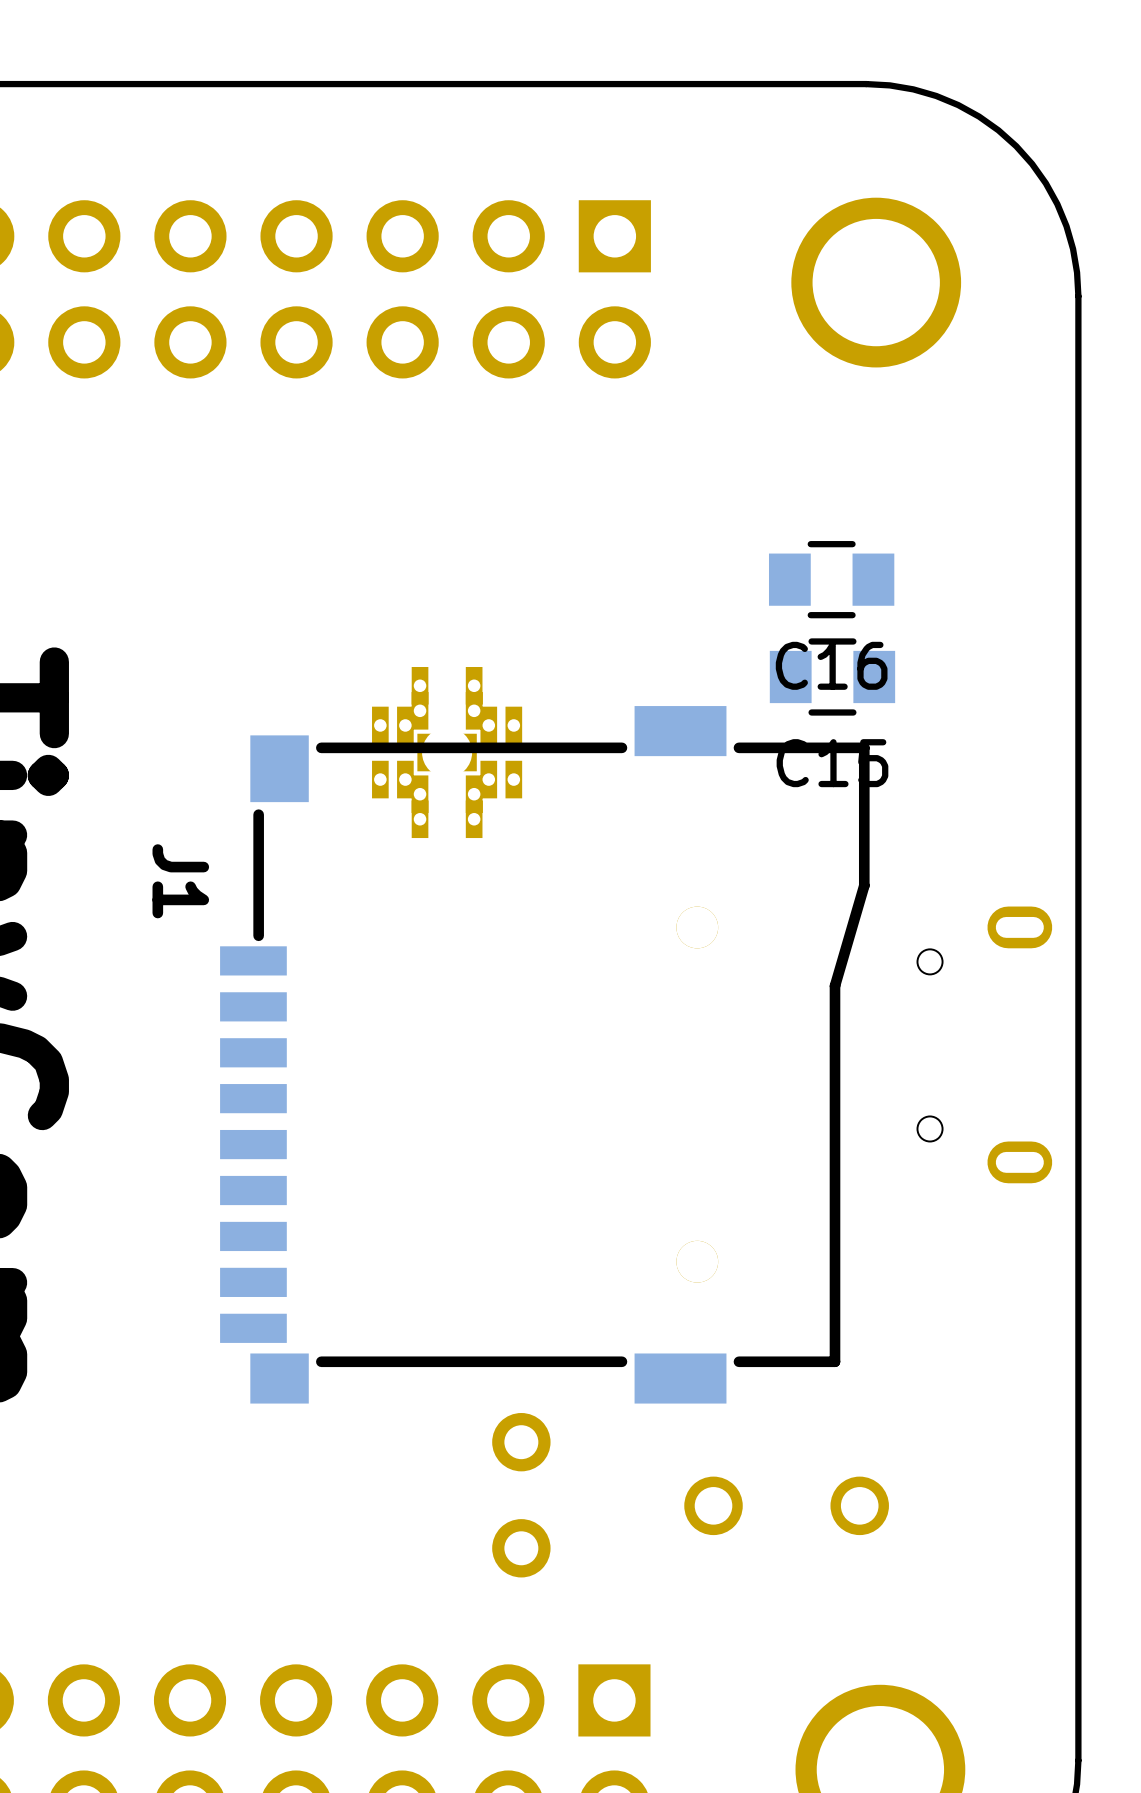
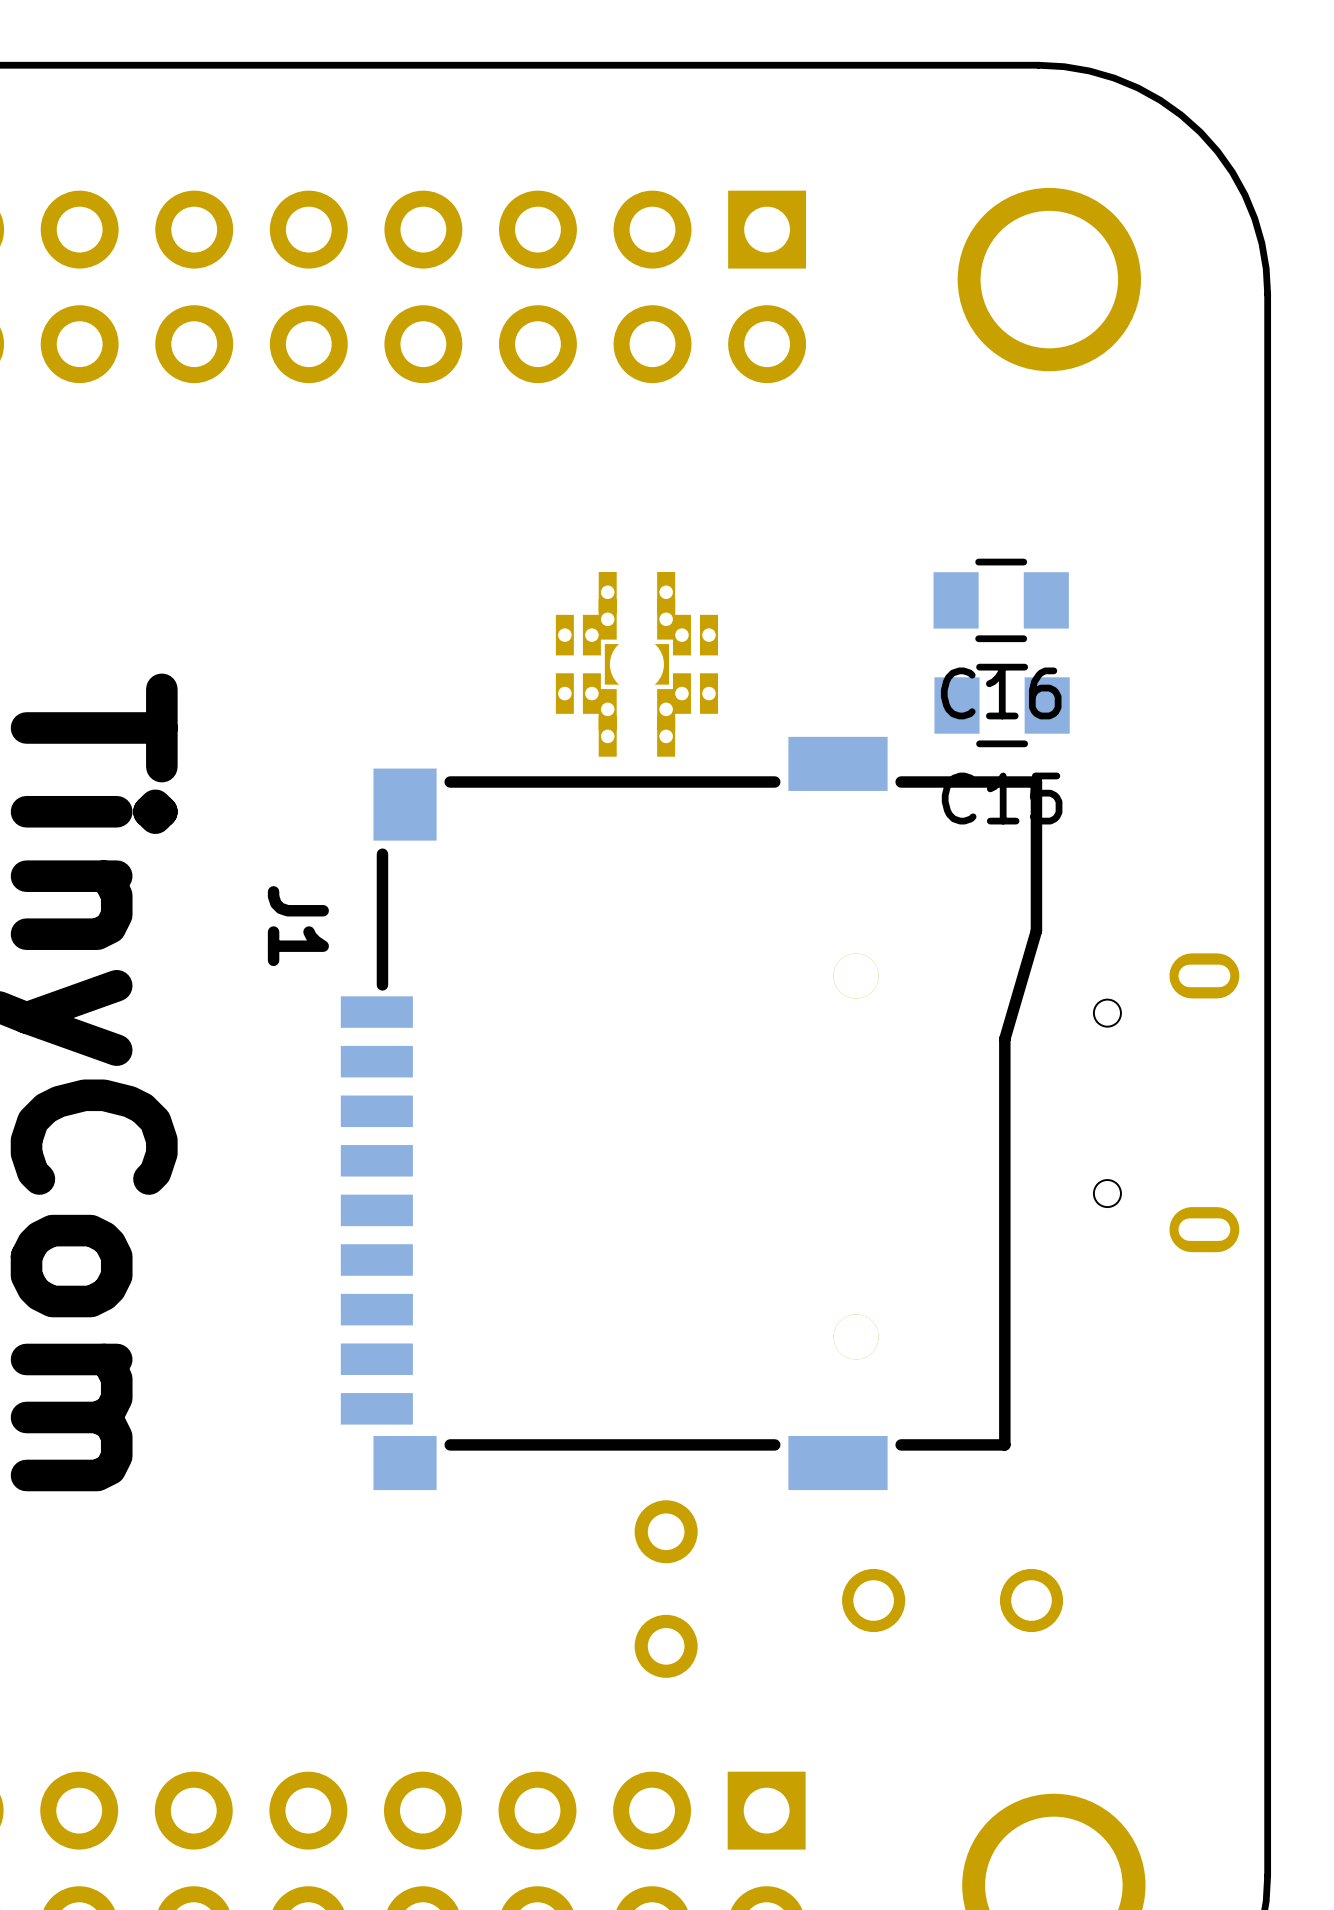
part position: (447, 752) -> (636, 664)

